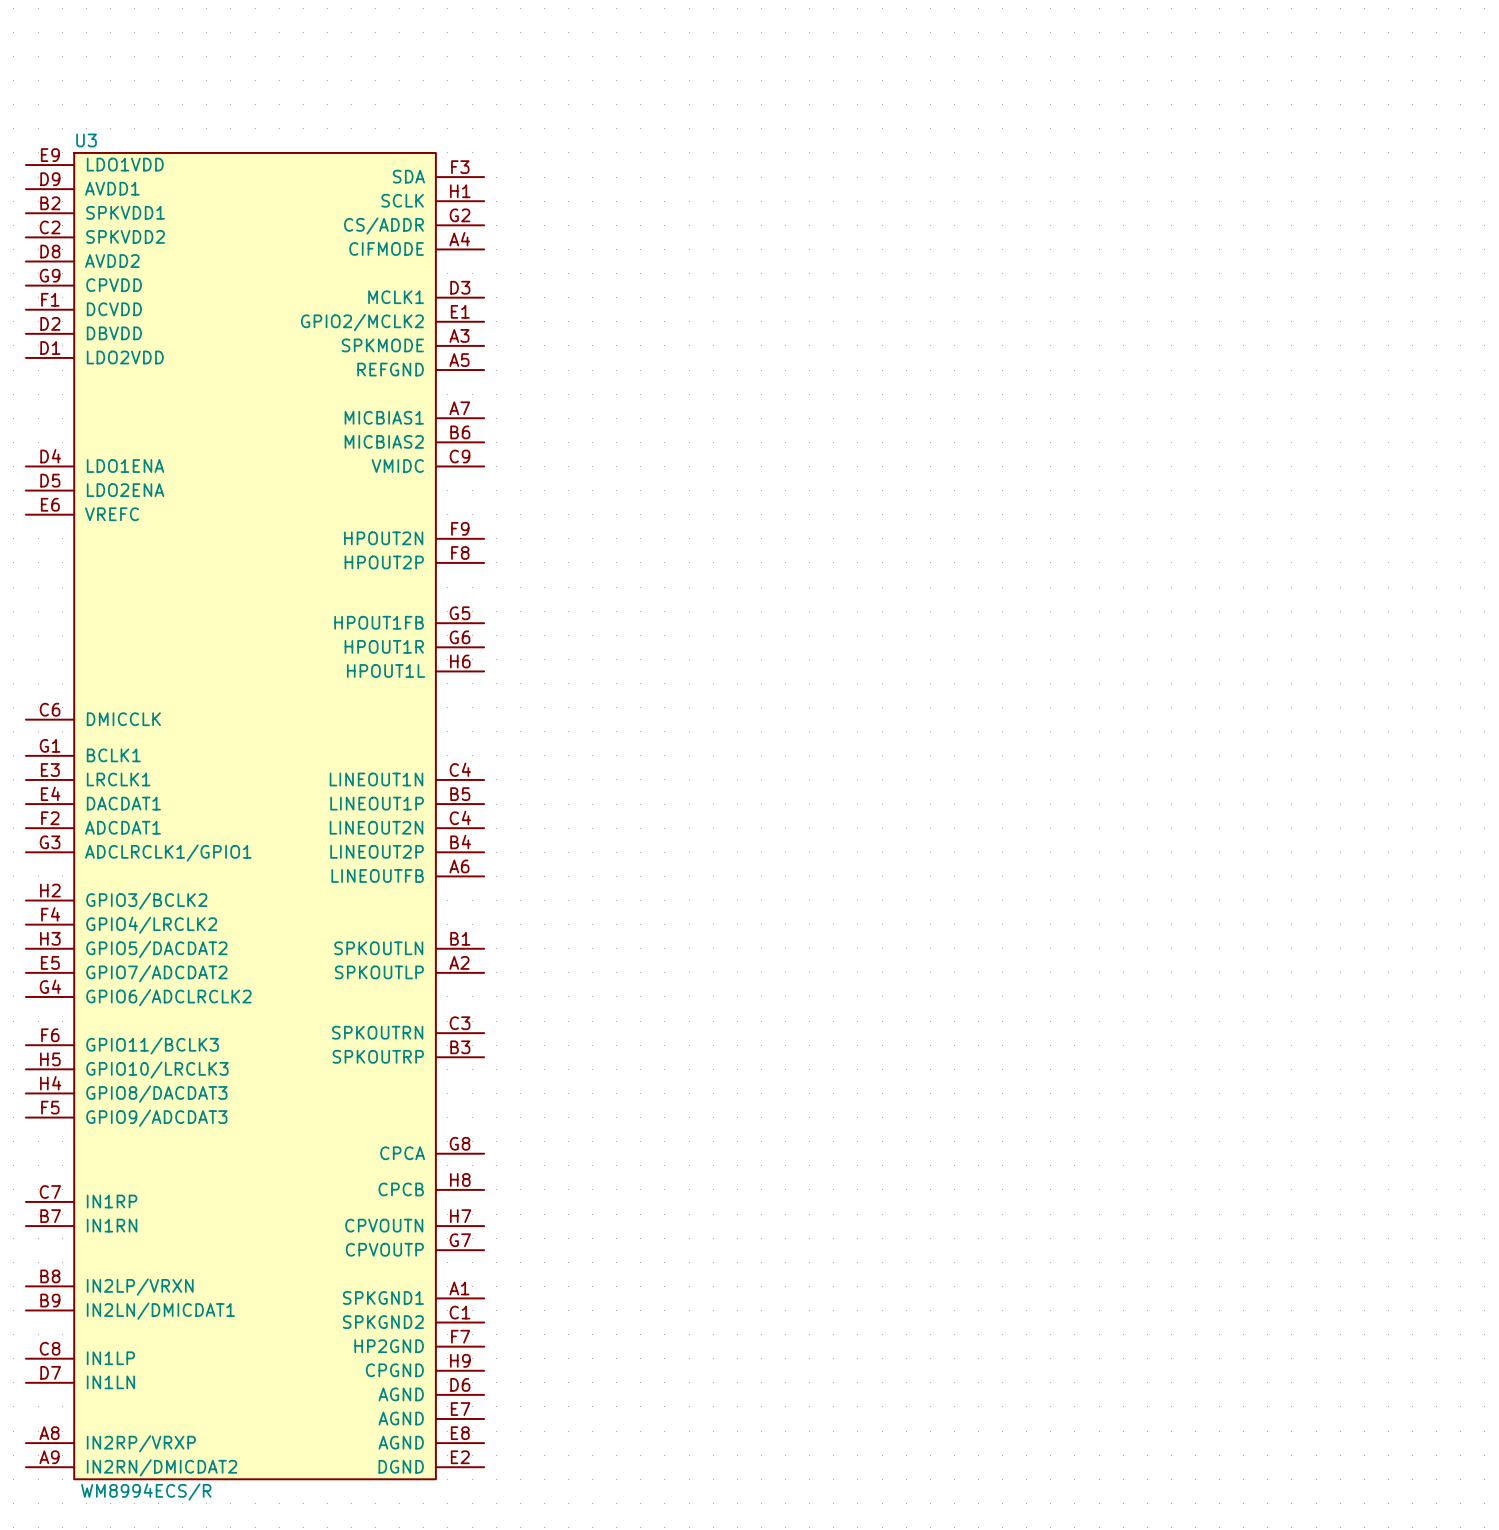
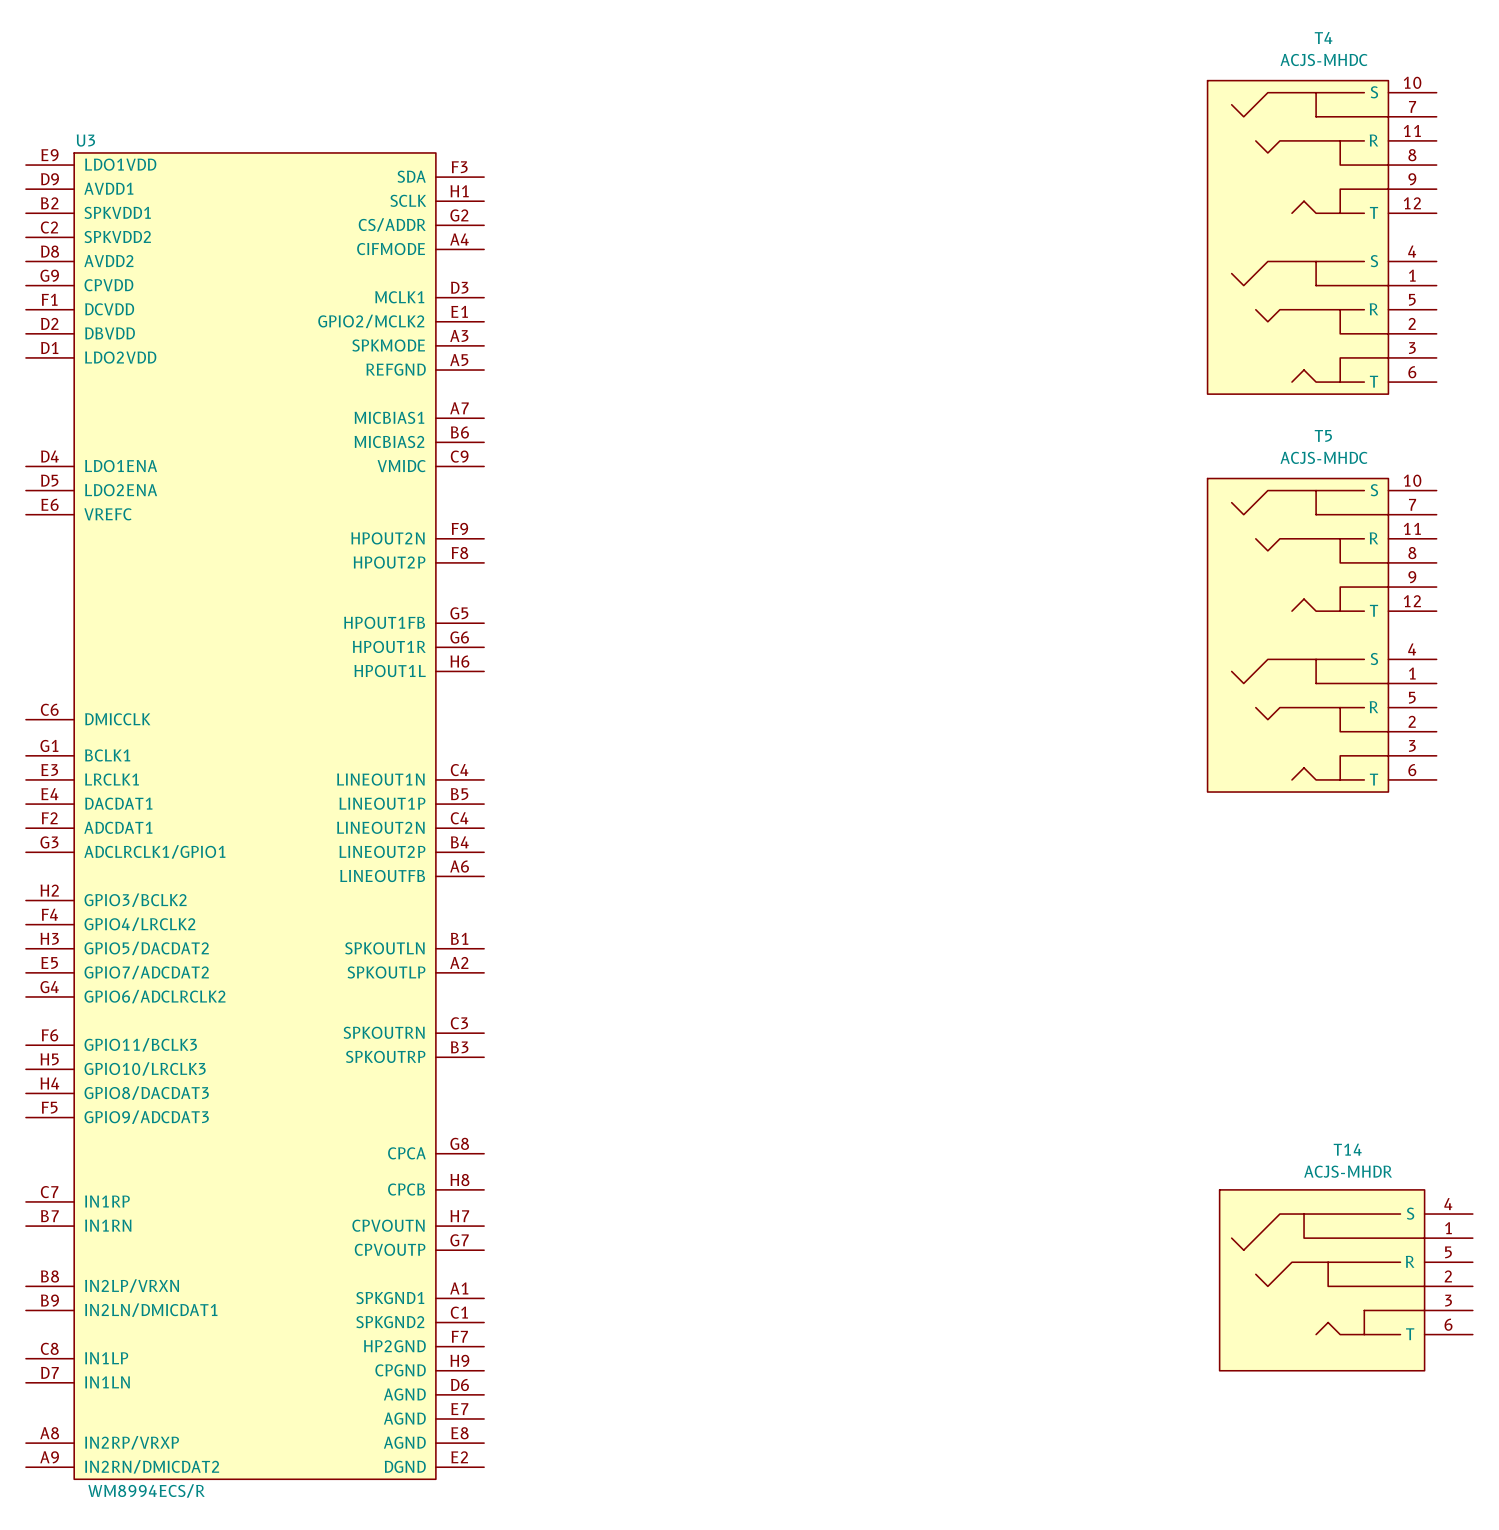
T4: none -> ACJS-MHDC (1322, 237)
T5: none -> ACJS-MHDC (1322, 635)
T14: none -> ACJS-MHDR (1346, 1280)

